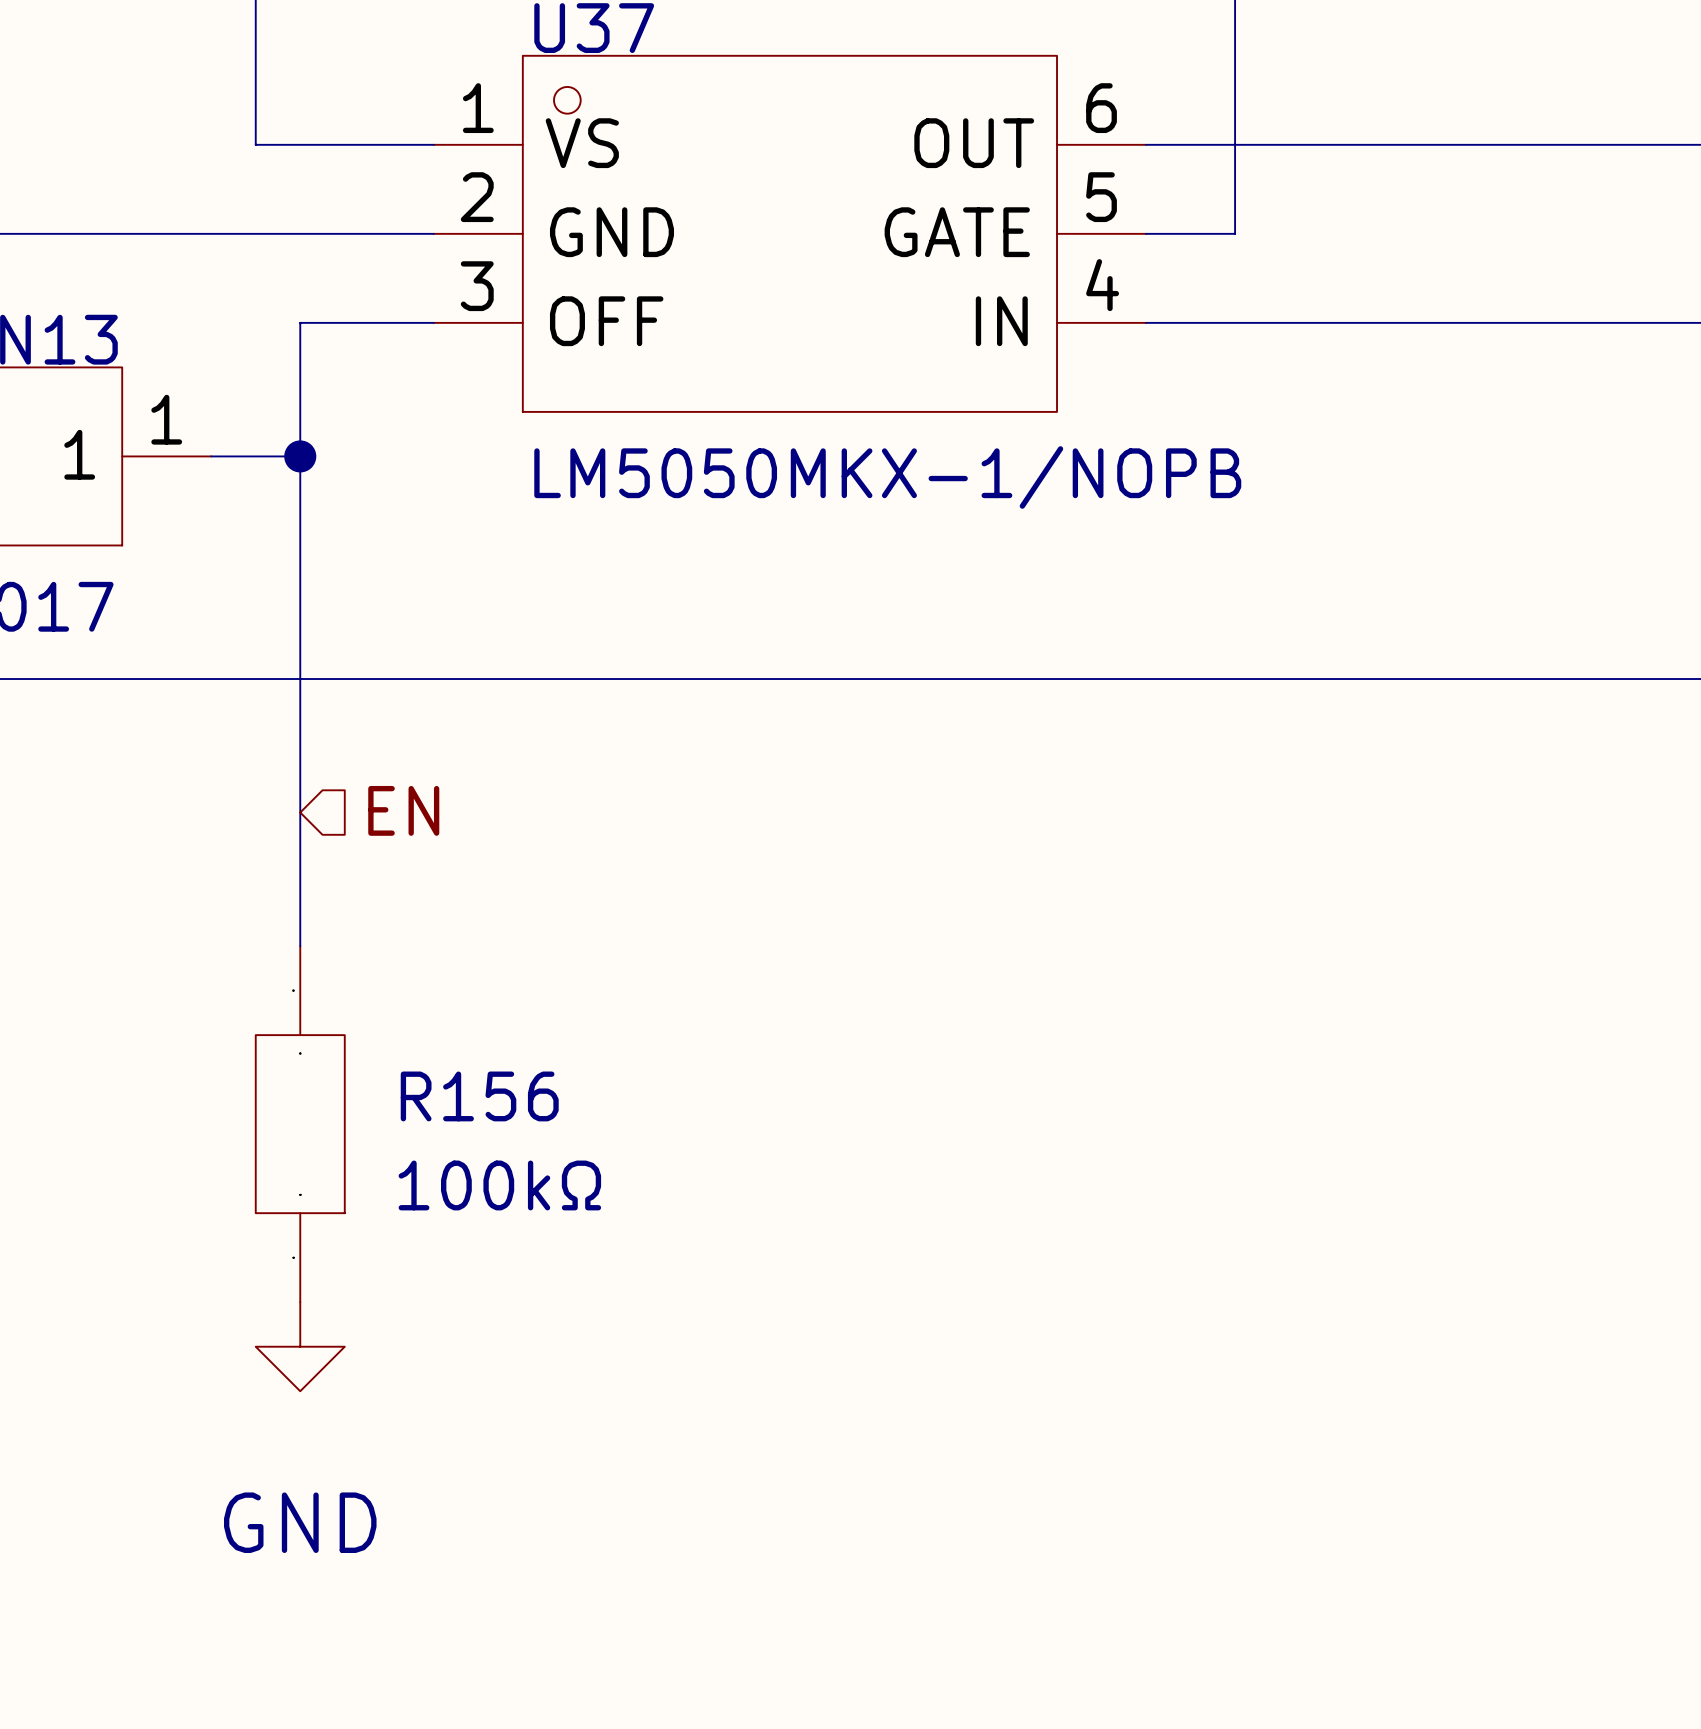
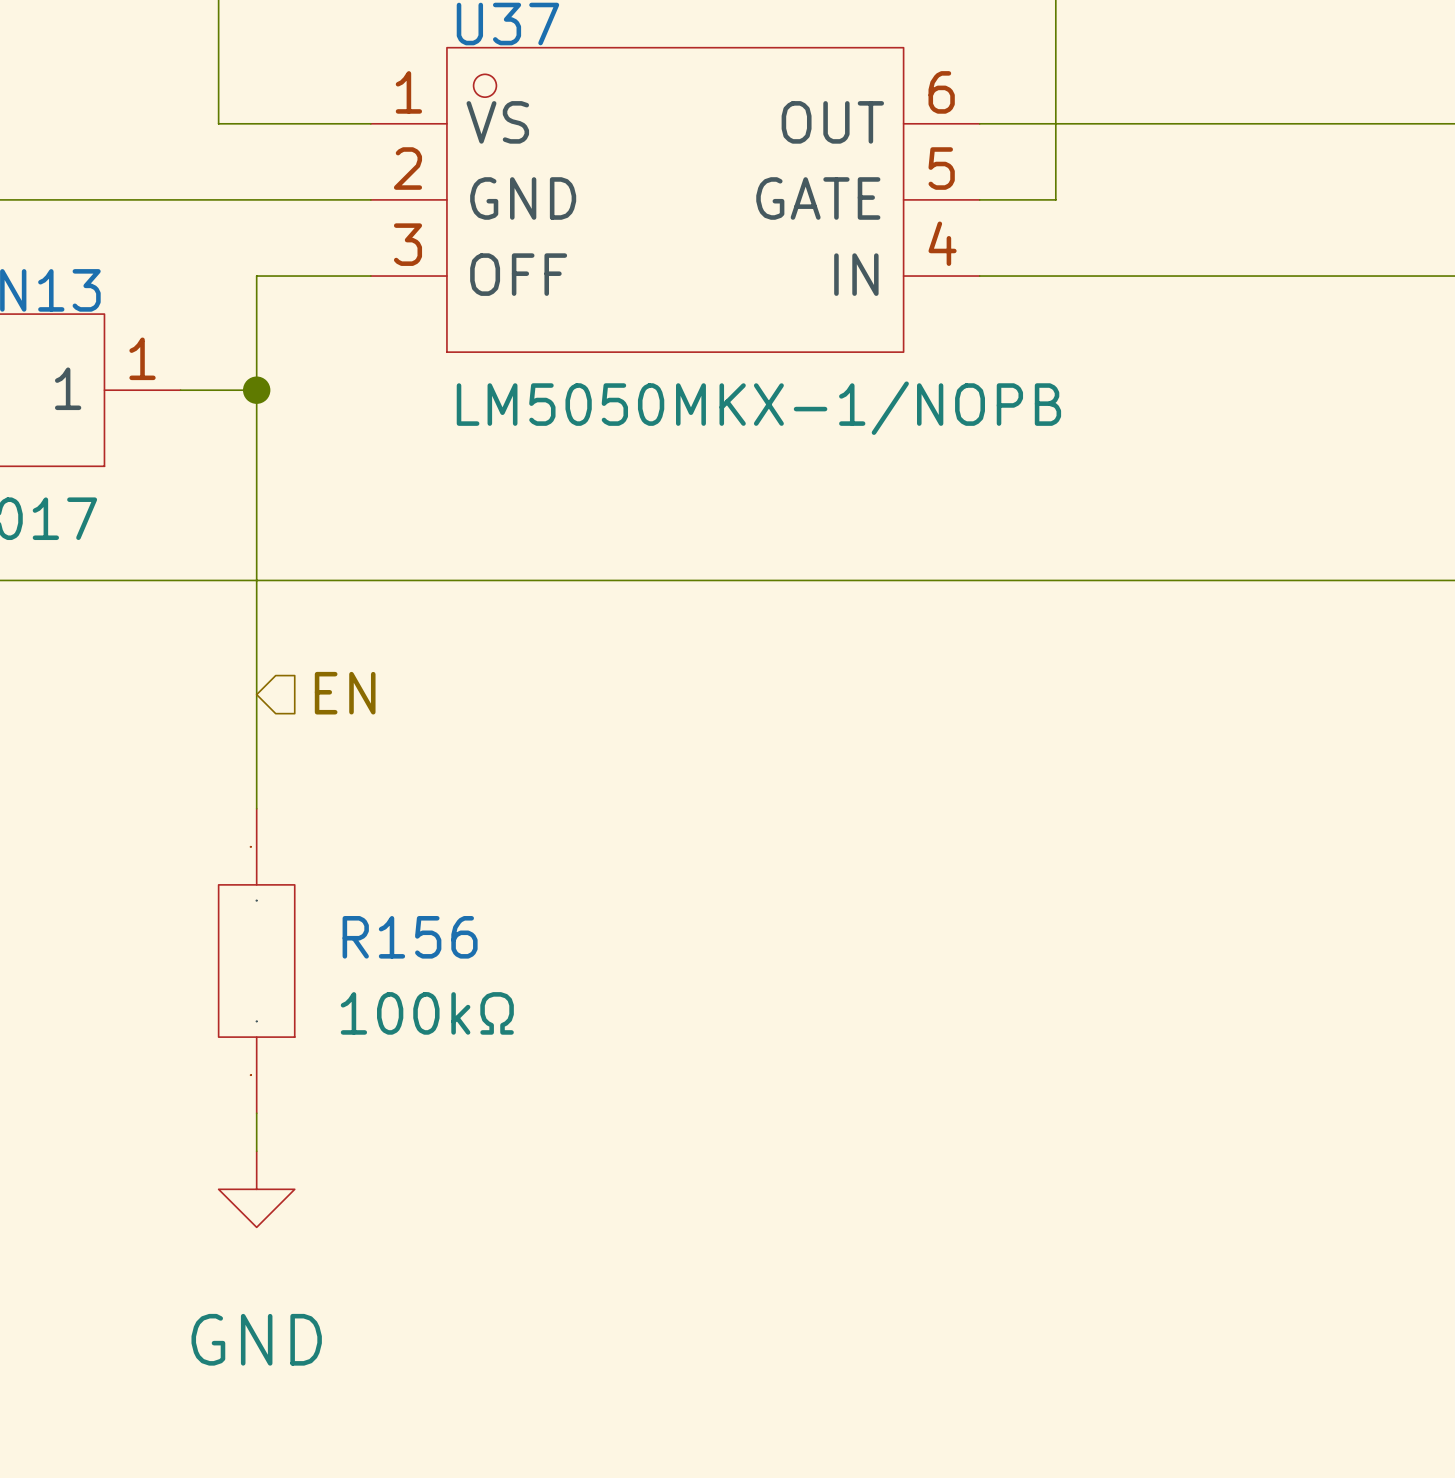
power symbol position: GND (300, 1346) -> GND (256, 1189)

